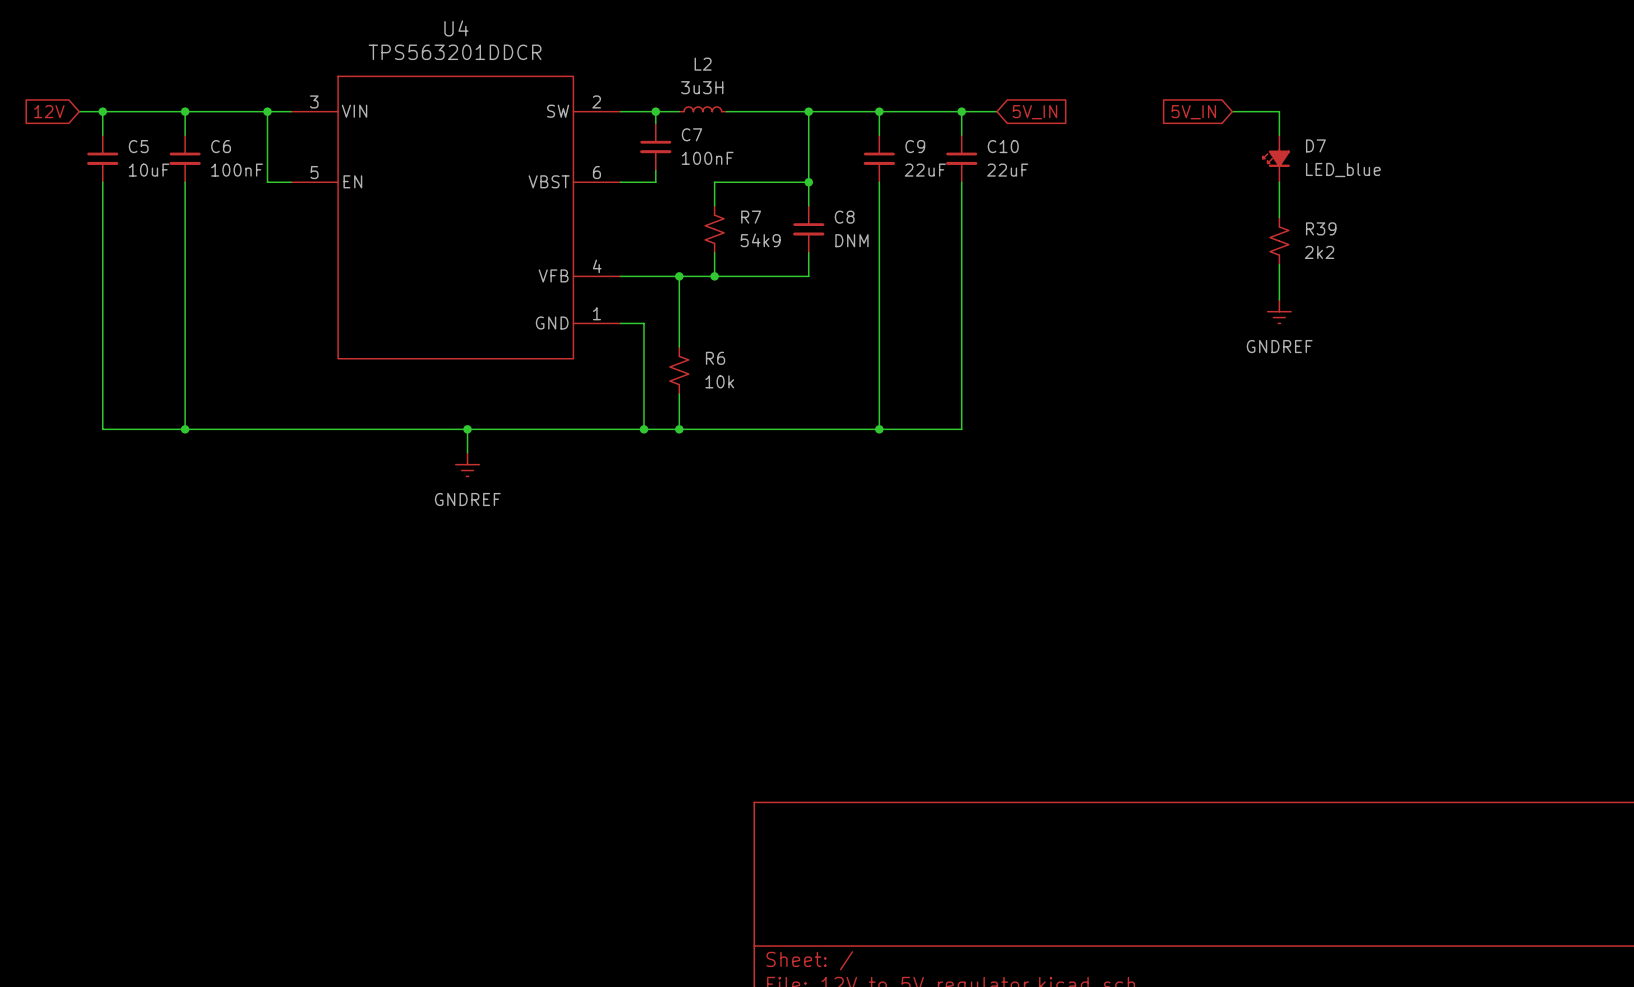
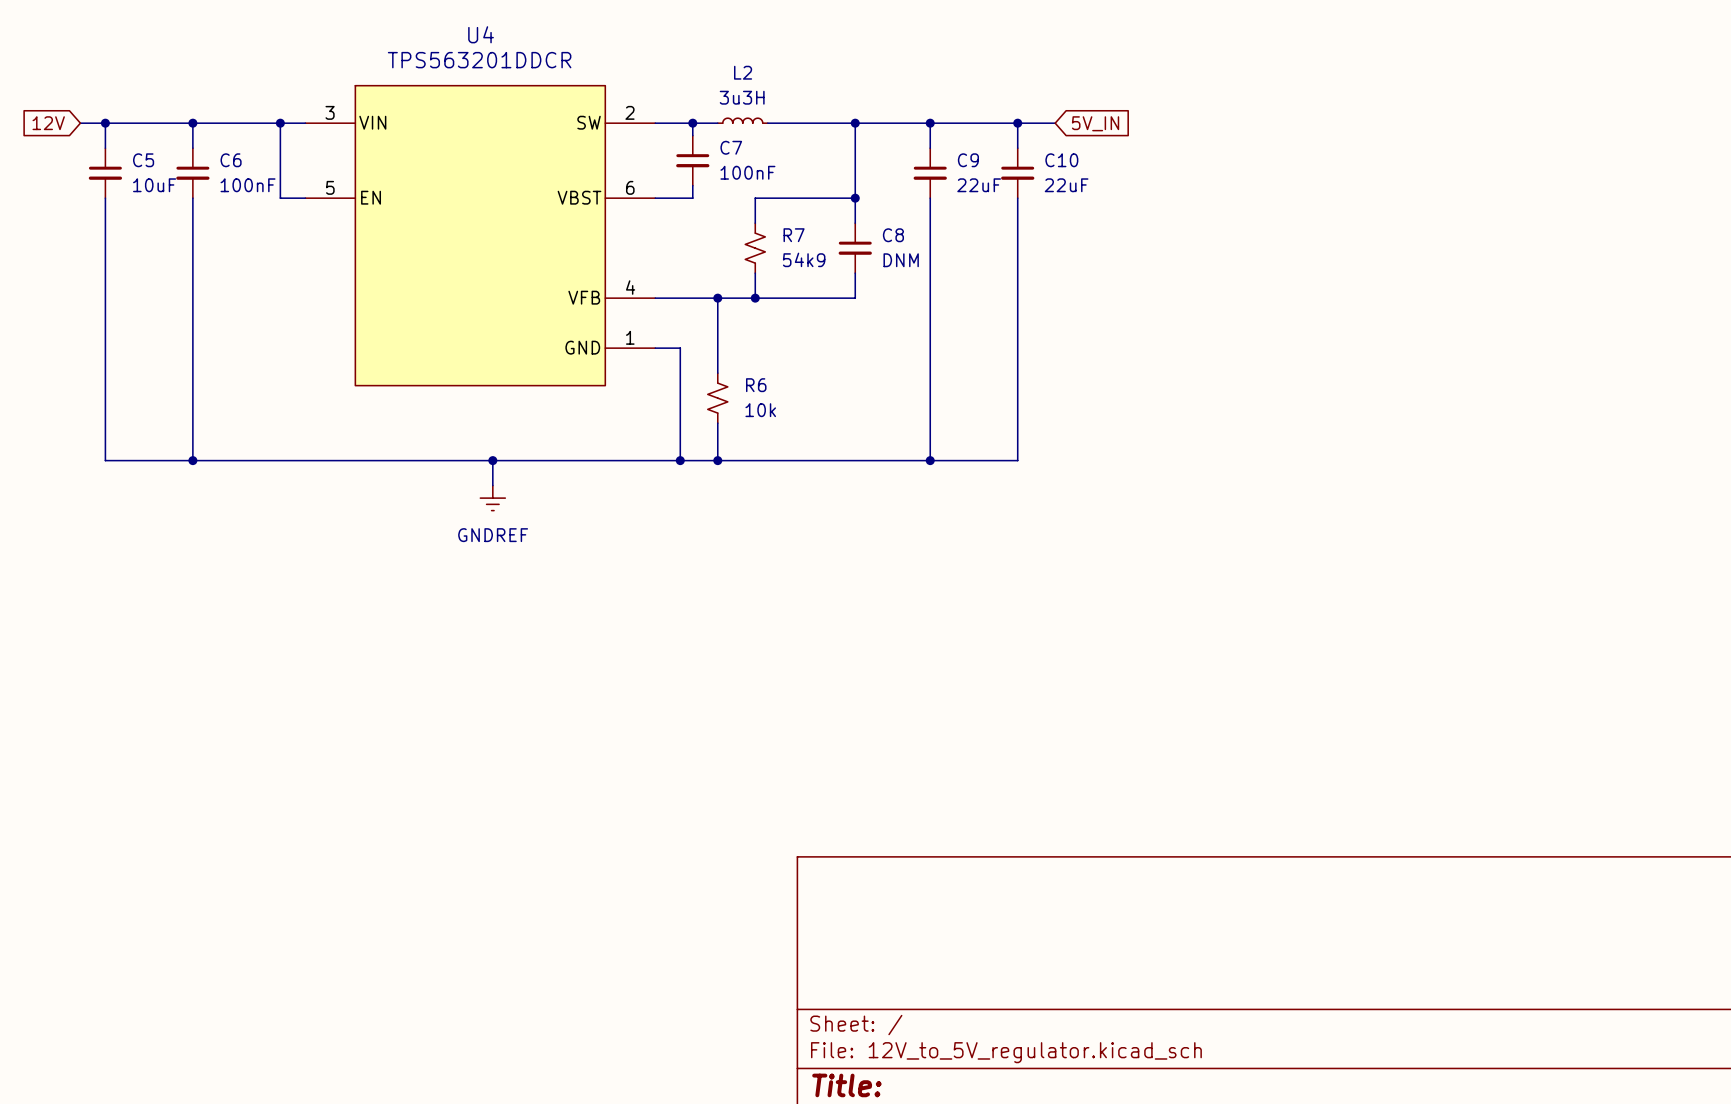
wire: (1232, 111) (1279, 111) (1279, 135) -> none
global label: 5V_IN (1193, 112) -> none
D7: LED_blue (1276, 158) -> none
wire: (1279, 182) (1279, 217) -> none
R39: 2k2 (1279, 241) -> none
wire: (1279, 264) (1279, 299) -> none
power symbol: GNDREF (1279, 311) -> none

